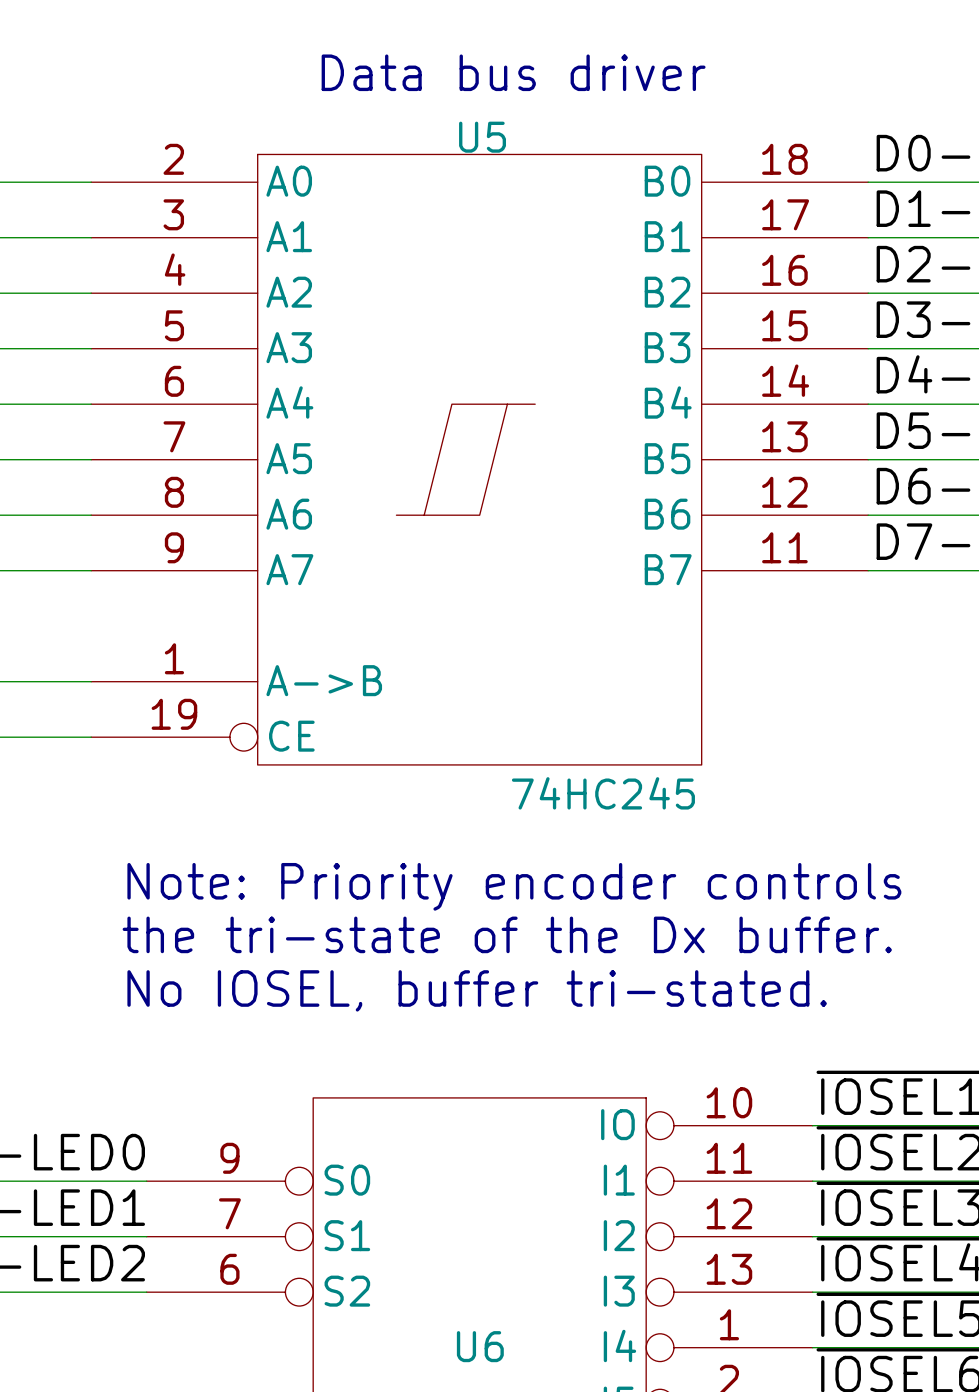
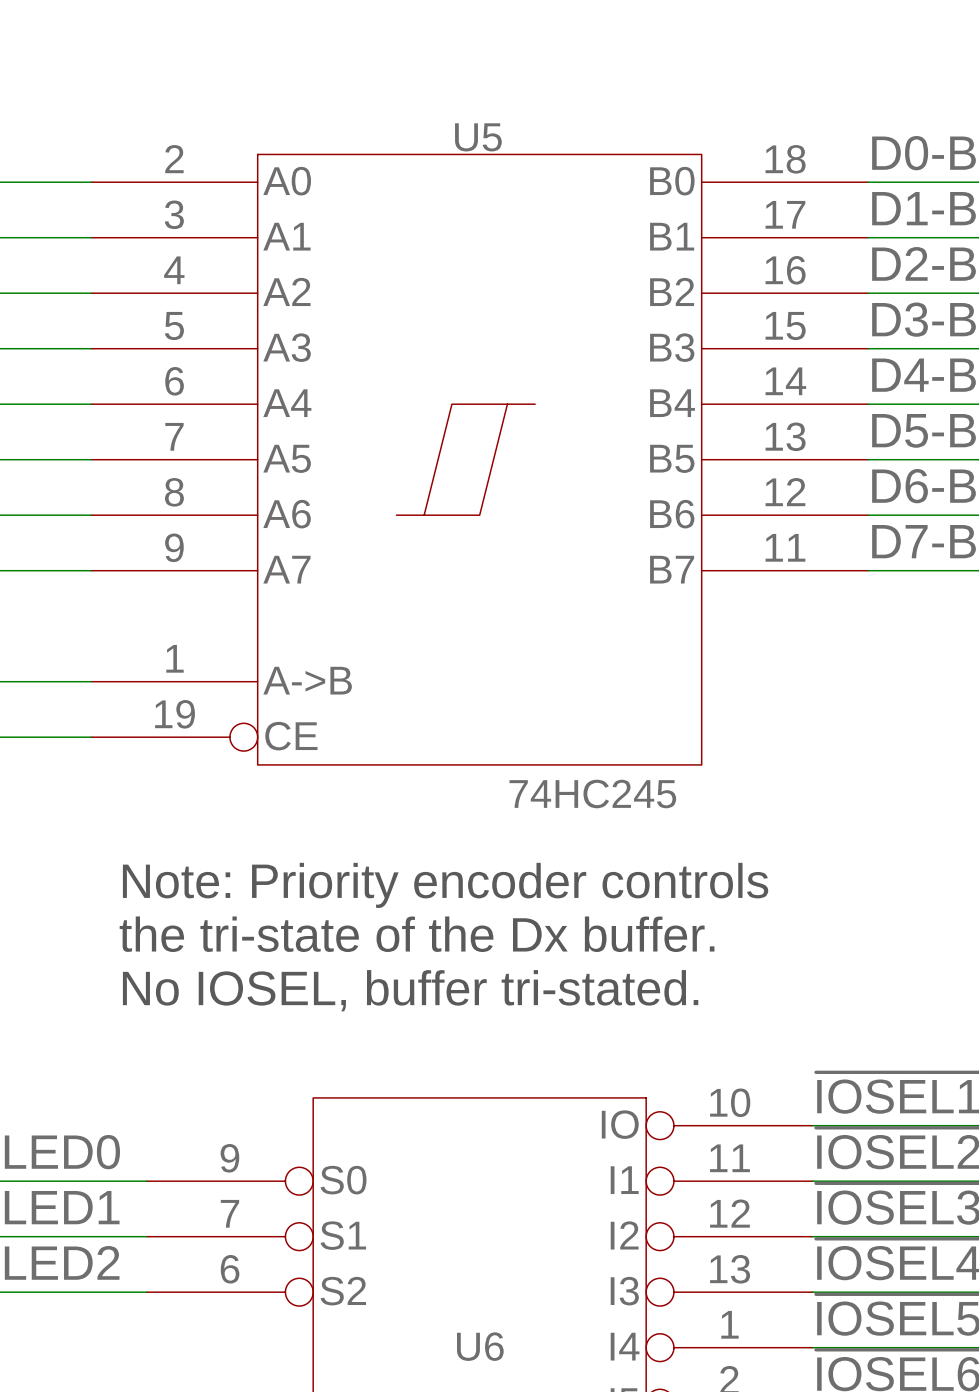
text: Data bus driver (513, 72) -> none

